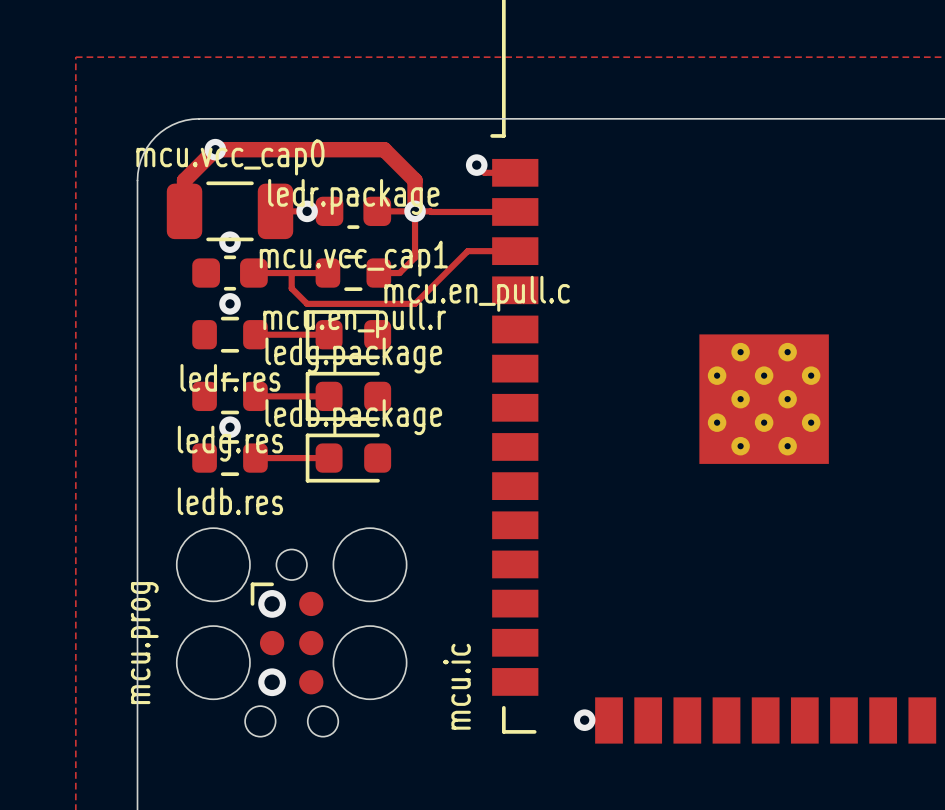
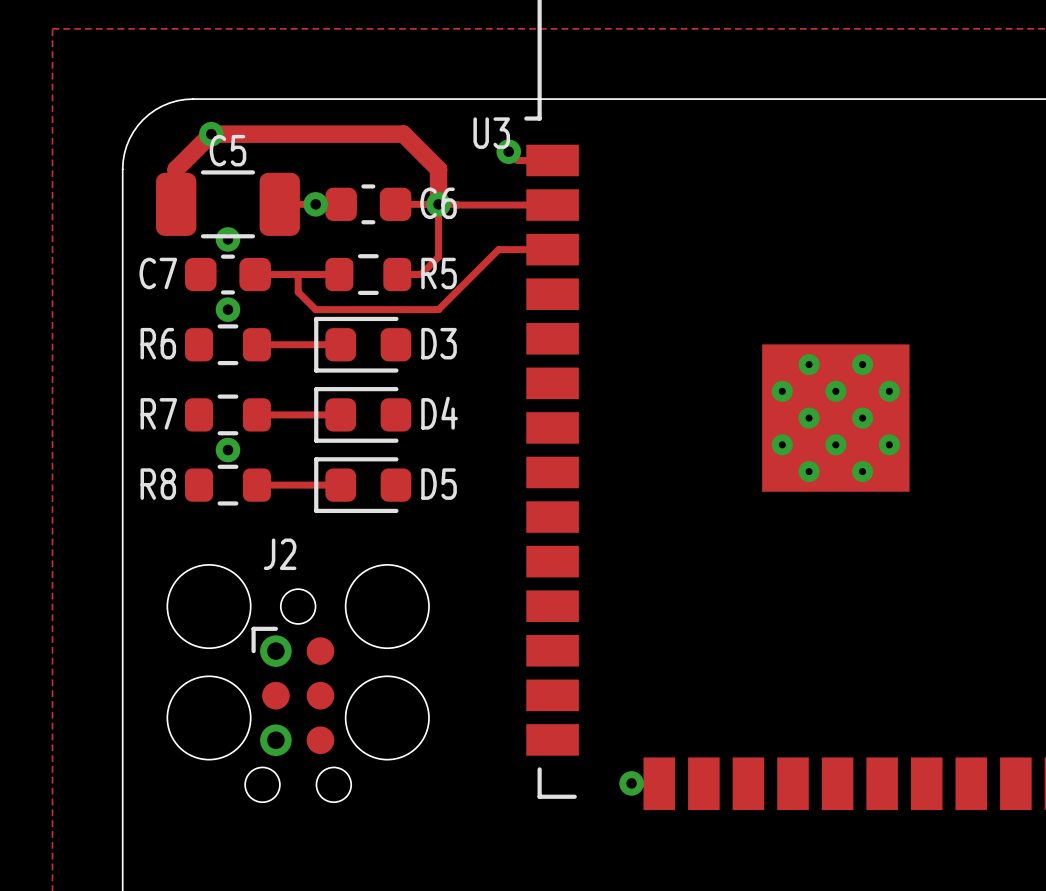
mcu.vcc_cap0 name: mcu.vcc_cap0 (230, 157) -> C5 (227, 150)
ledr.package name: ledr.package (353, 196) -> D3 (439, 343)
mcu.vcc_cap1 name: mcu.vcc_cap1 (353, 258) -> C6 (438, 203)
mcu.en_pull.c name: mcu.en_pull.c (477, 293) -> C7 (158, 273)
mcu.en_pull.r name: mcu.en_pull.r (354, 320) -> R5 (439, 273)
ledg.package name: ledg.package (353, 355) -> D4 (439, 413)
ledr.res name: ledr.res (230, 377) -> R6 (158, 343)
ledb.package name: ledb.package (353, 417) -> D5 (439, 484)
ledg.res name: ledg.res (230, 443) -> R7 (158, 413)
ledb.res name: ledb.res (230, 501) -> R8 (158, 484)
mcu.prog name: mcu.prog (144, 643) -> J2 (280, 554)
mcu.ic name: mcu.ic (456, 686) -> U3 (491, 133)

